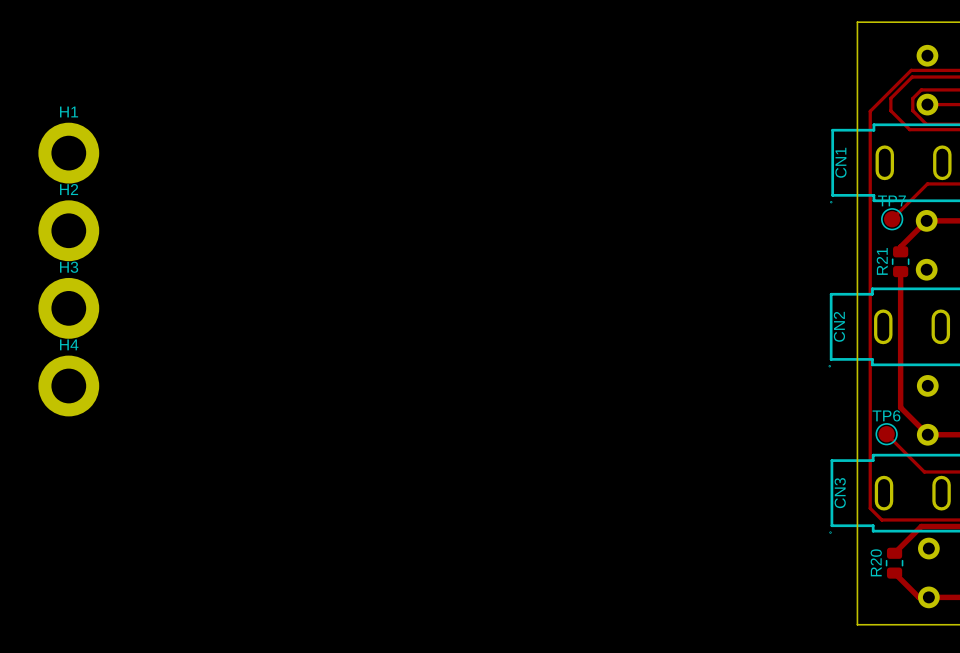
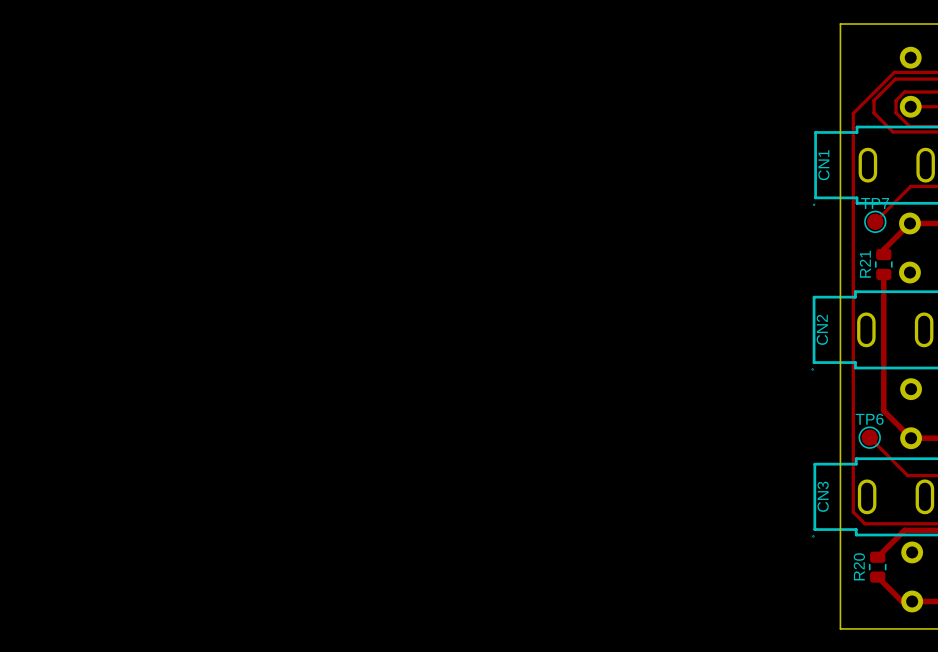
H1: (68, 153) -> none
H2: (68, 230) -> none
H3: (68, 308) -> none
H4: (68, 386) -> none

